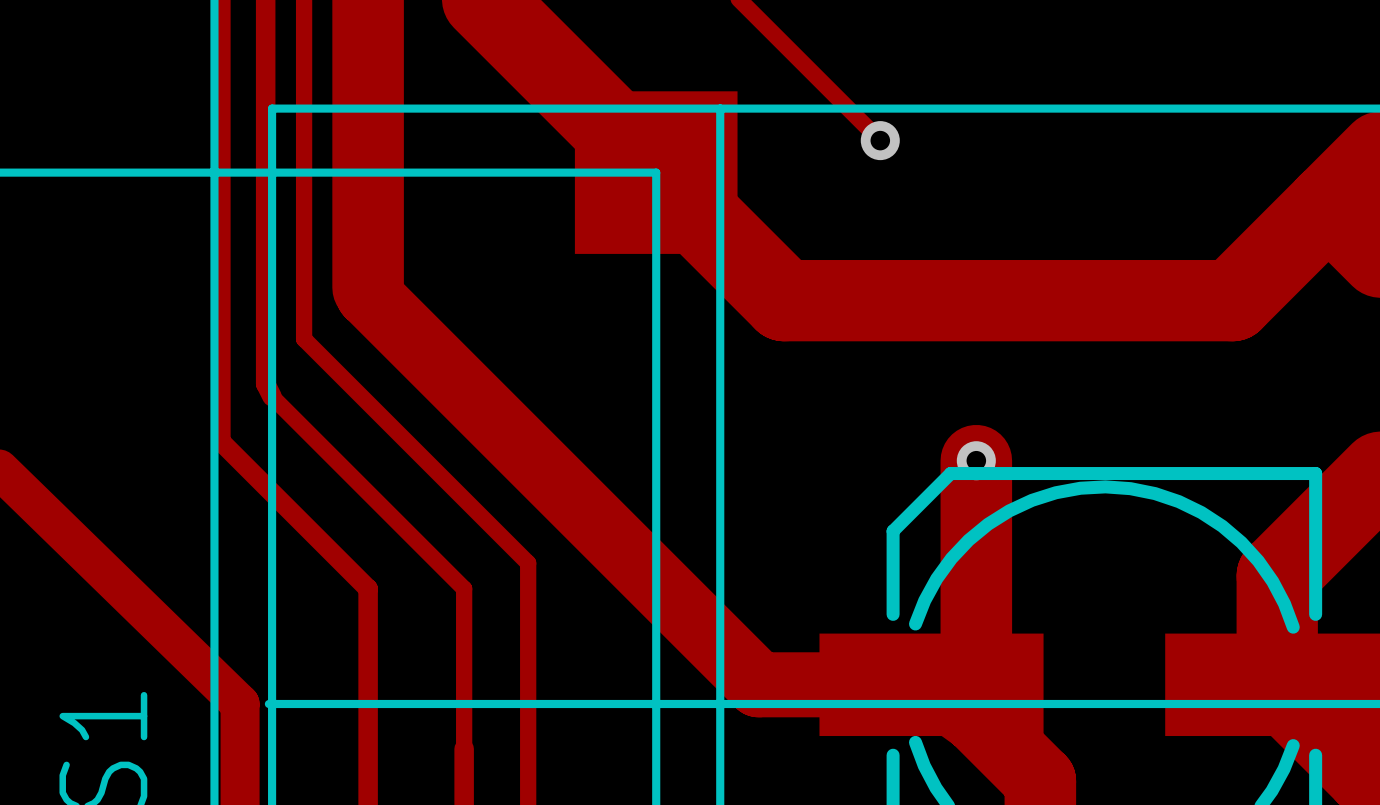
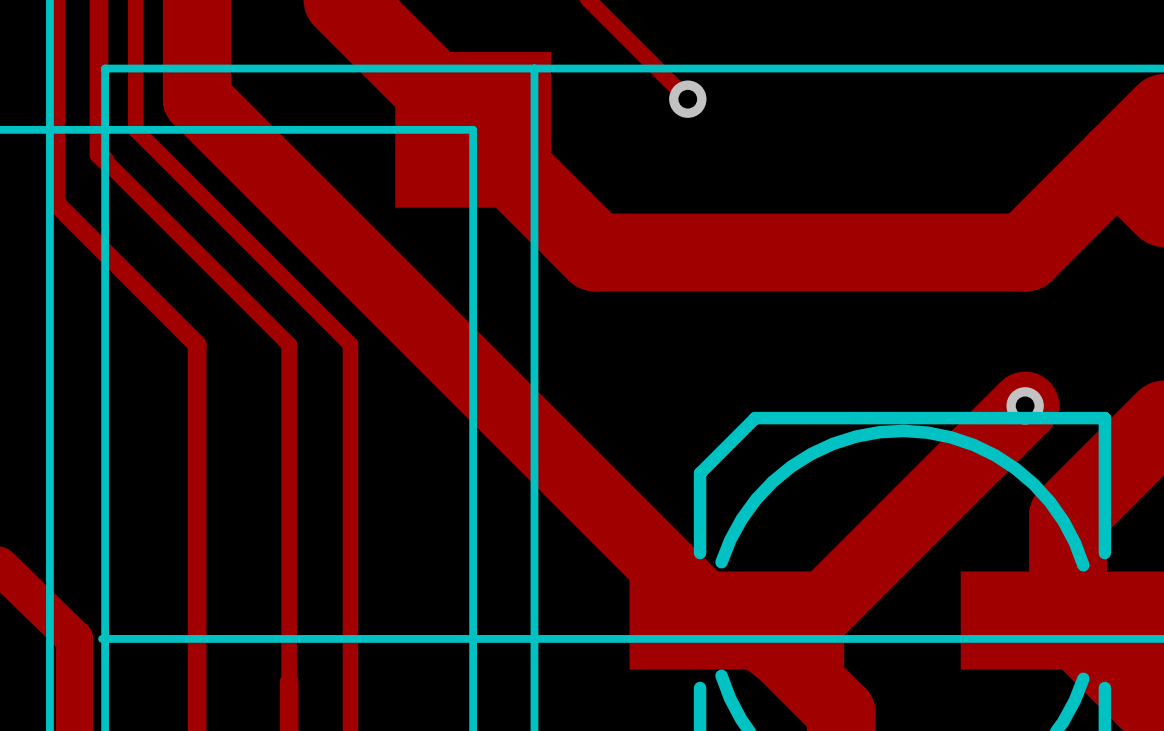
track: (368, 140) (368, 294) (758, 684) (931, 684) -> (197, 99) (718, 620)
track: (304, 172) (304, 339) (528, 563) -> (135, 129) (350, 344) (350, 503)
track: (265, 198) (265, 383) (272, 396) (464, 588) -> (98, 154) (289, 344) (289, 528)
track: (220, 249) (220, 441) (368, 588) -> (56, 203) (197, 344) (197, 528)
track: (976, 460) (976, 716) -> (1025, 405) (779, 651)
via position: (976, 460) -> (1025, 405)

